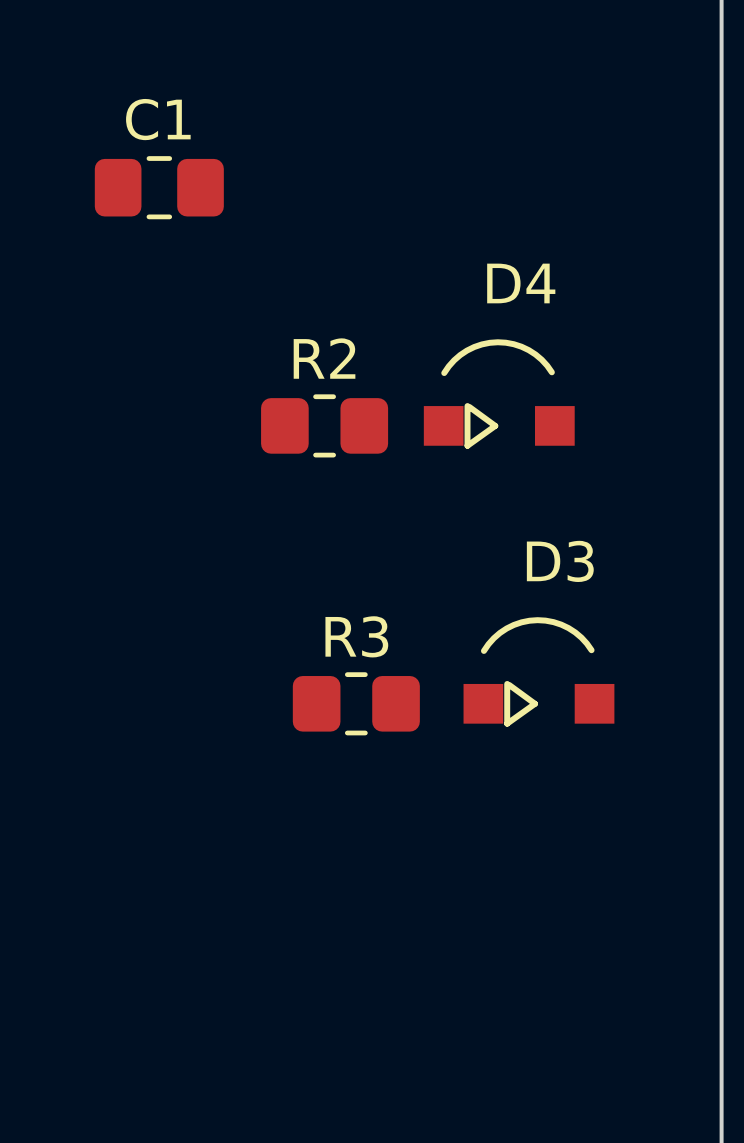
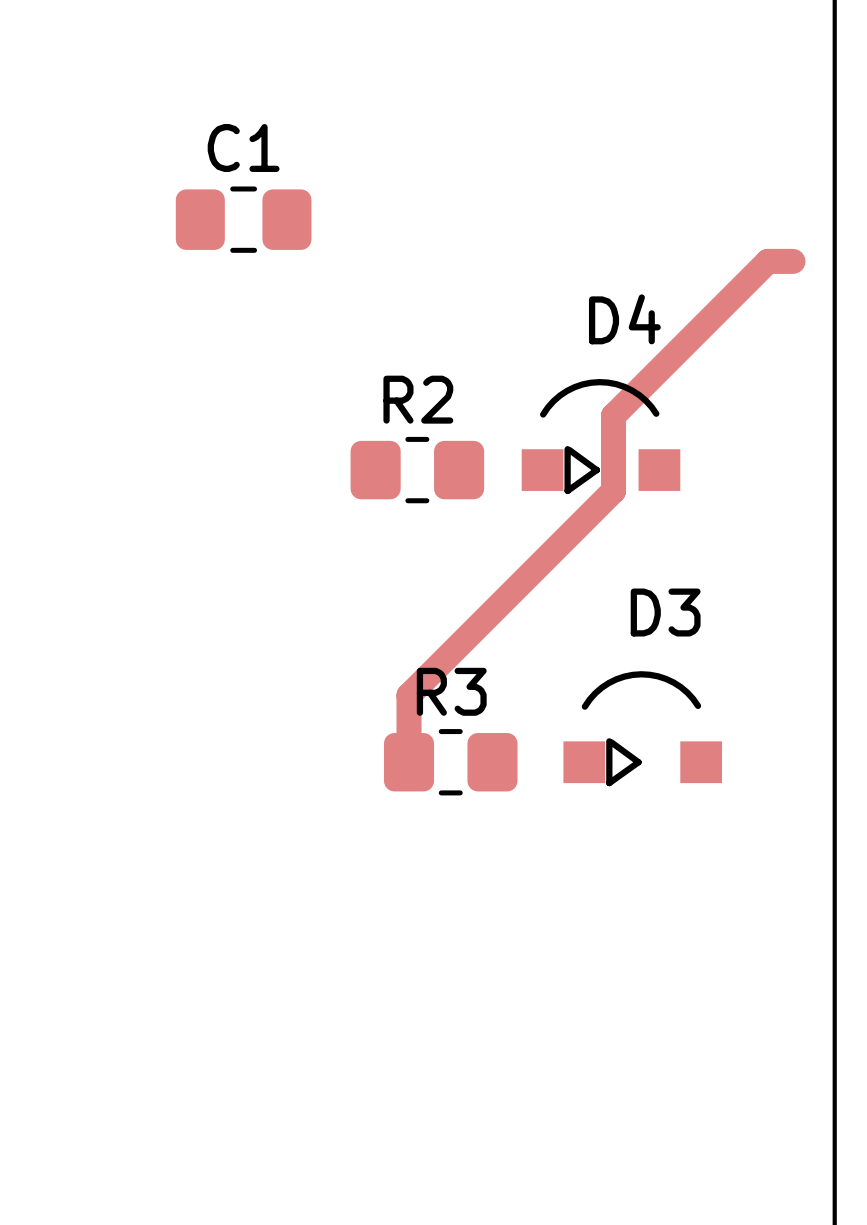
top track: none -> (792, 261) (767, 261) (613, 415) (613, 490) (409, 695) (409, 762)

